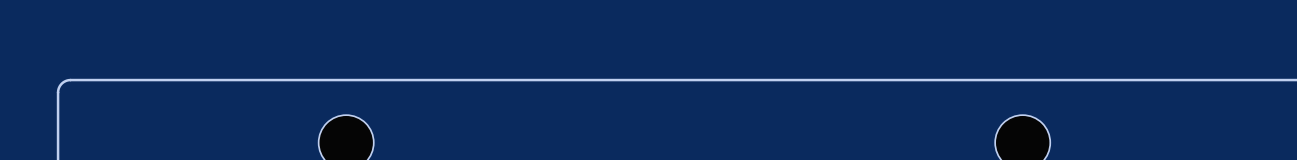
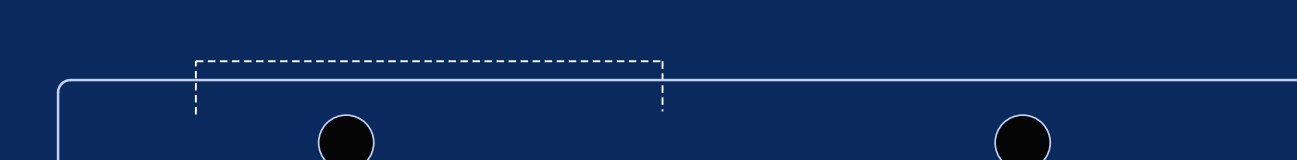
line: none -> (662, 111) (662, 61) (195, 61) (195, 114)

